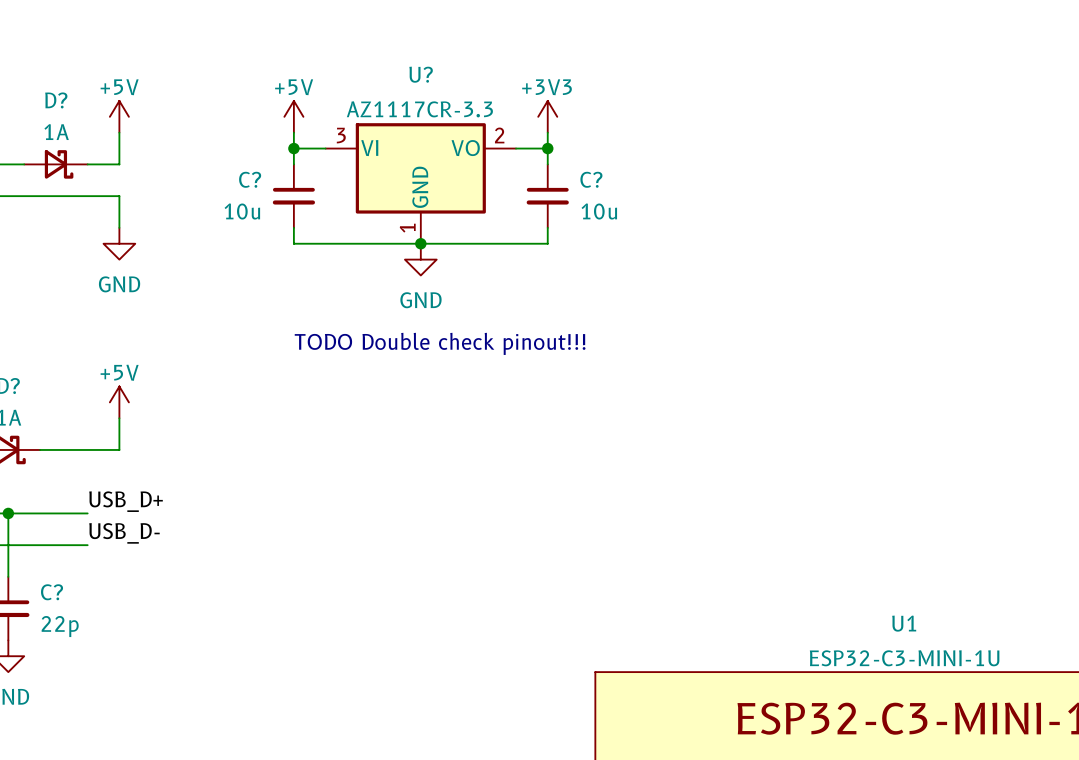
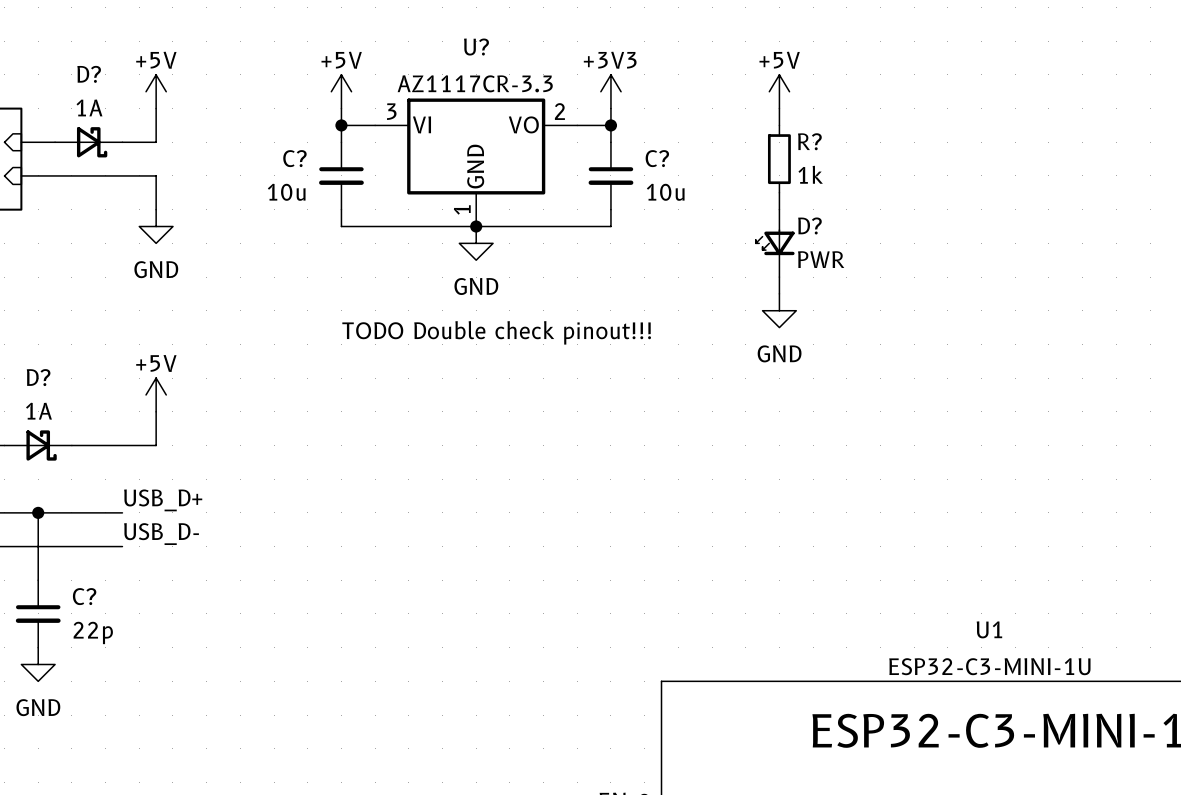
power symbol: none -> +5V (779, 91)
wire: none -> (779, 108) (779, 125)
R?: none -> 1k (779, 159)
wire: none -> (779, 192) (779, 209)
D?: none -> PWR (775, 243)
wire: none -> (779, 277) (779, 293)
power symbol: none -> GND (779, 310)

